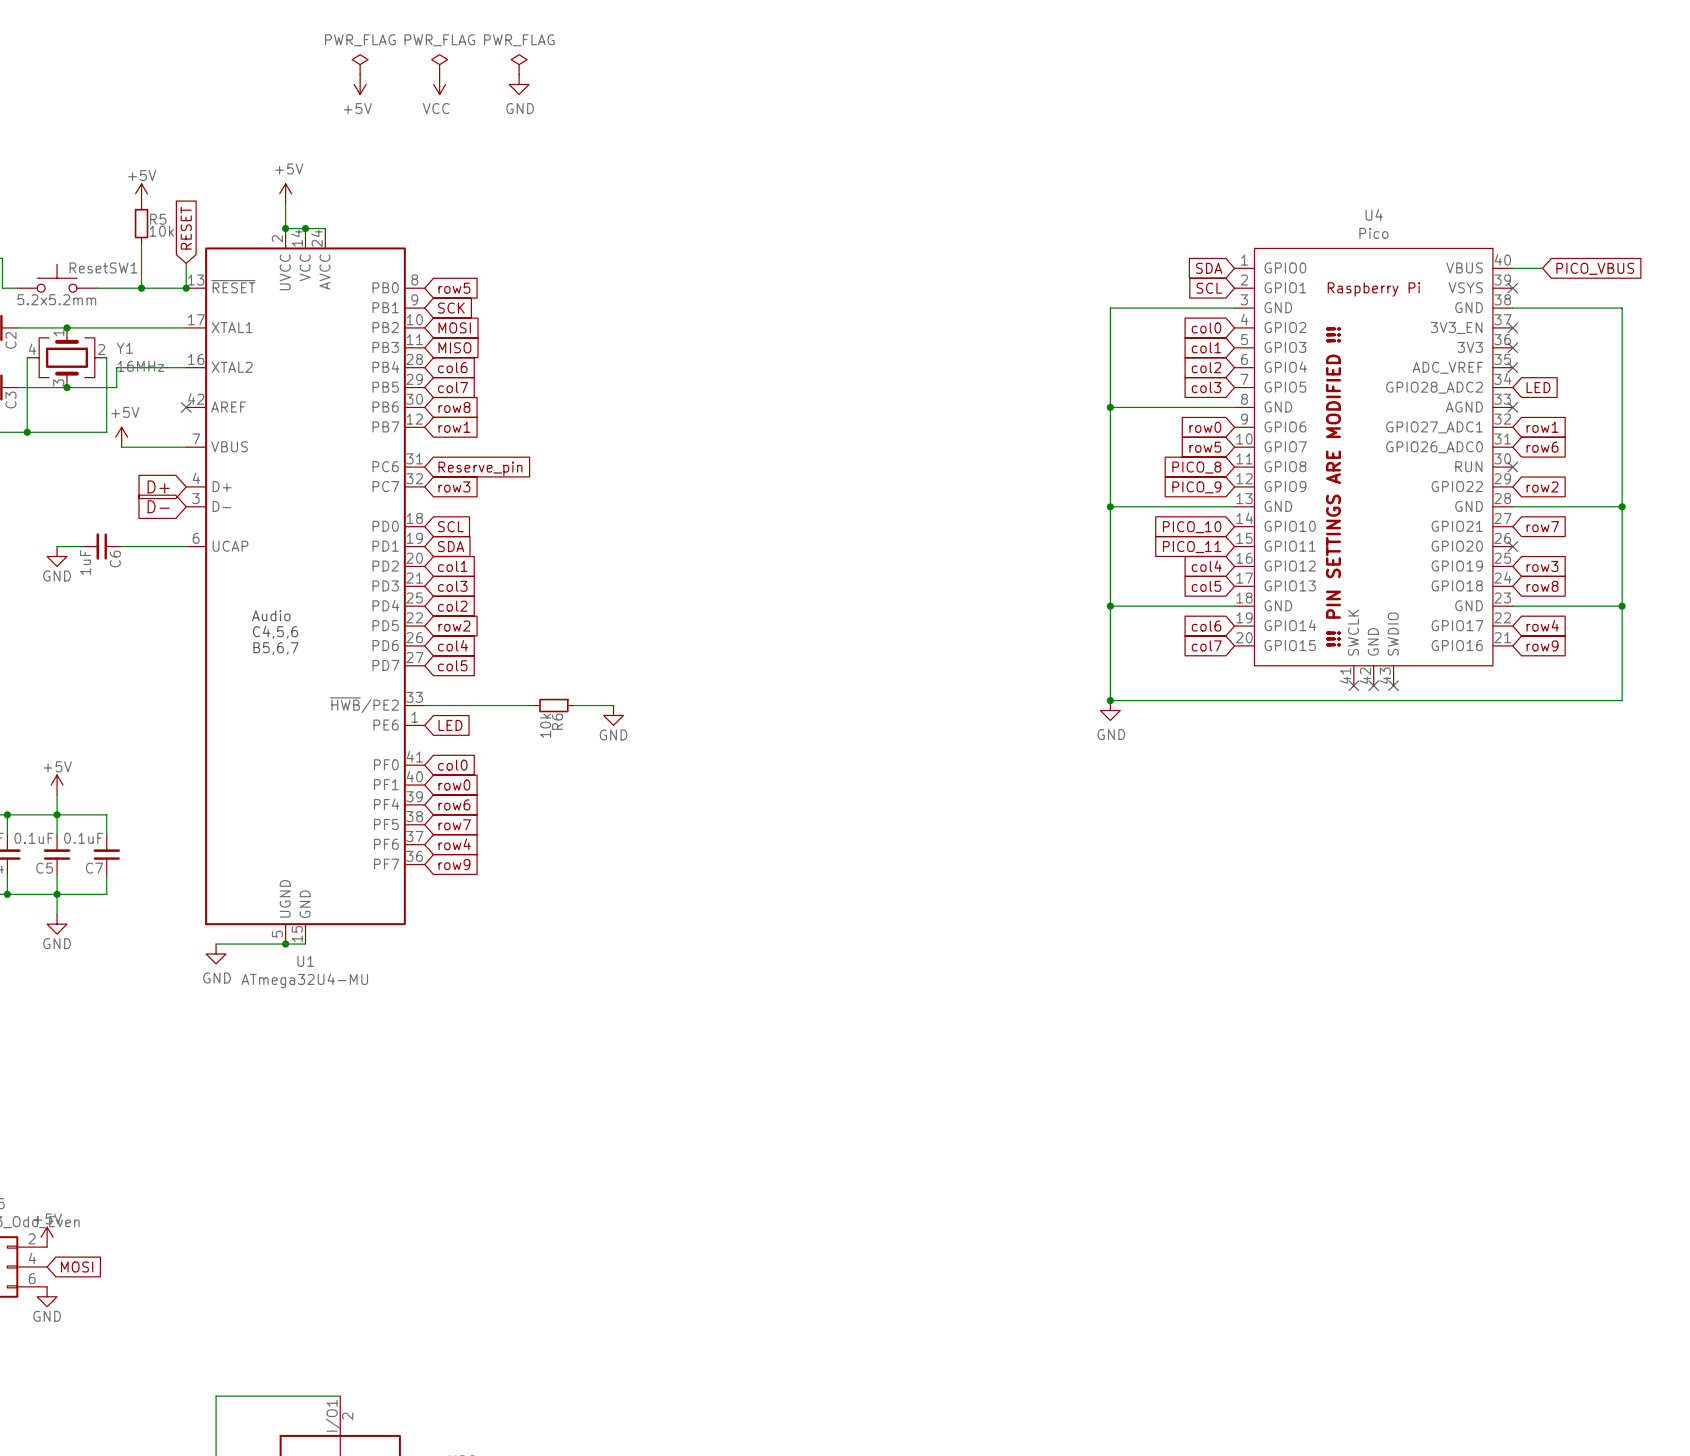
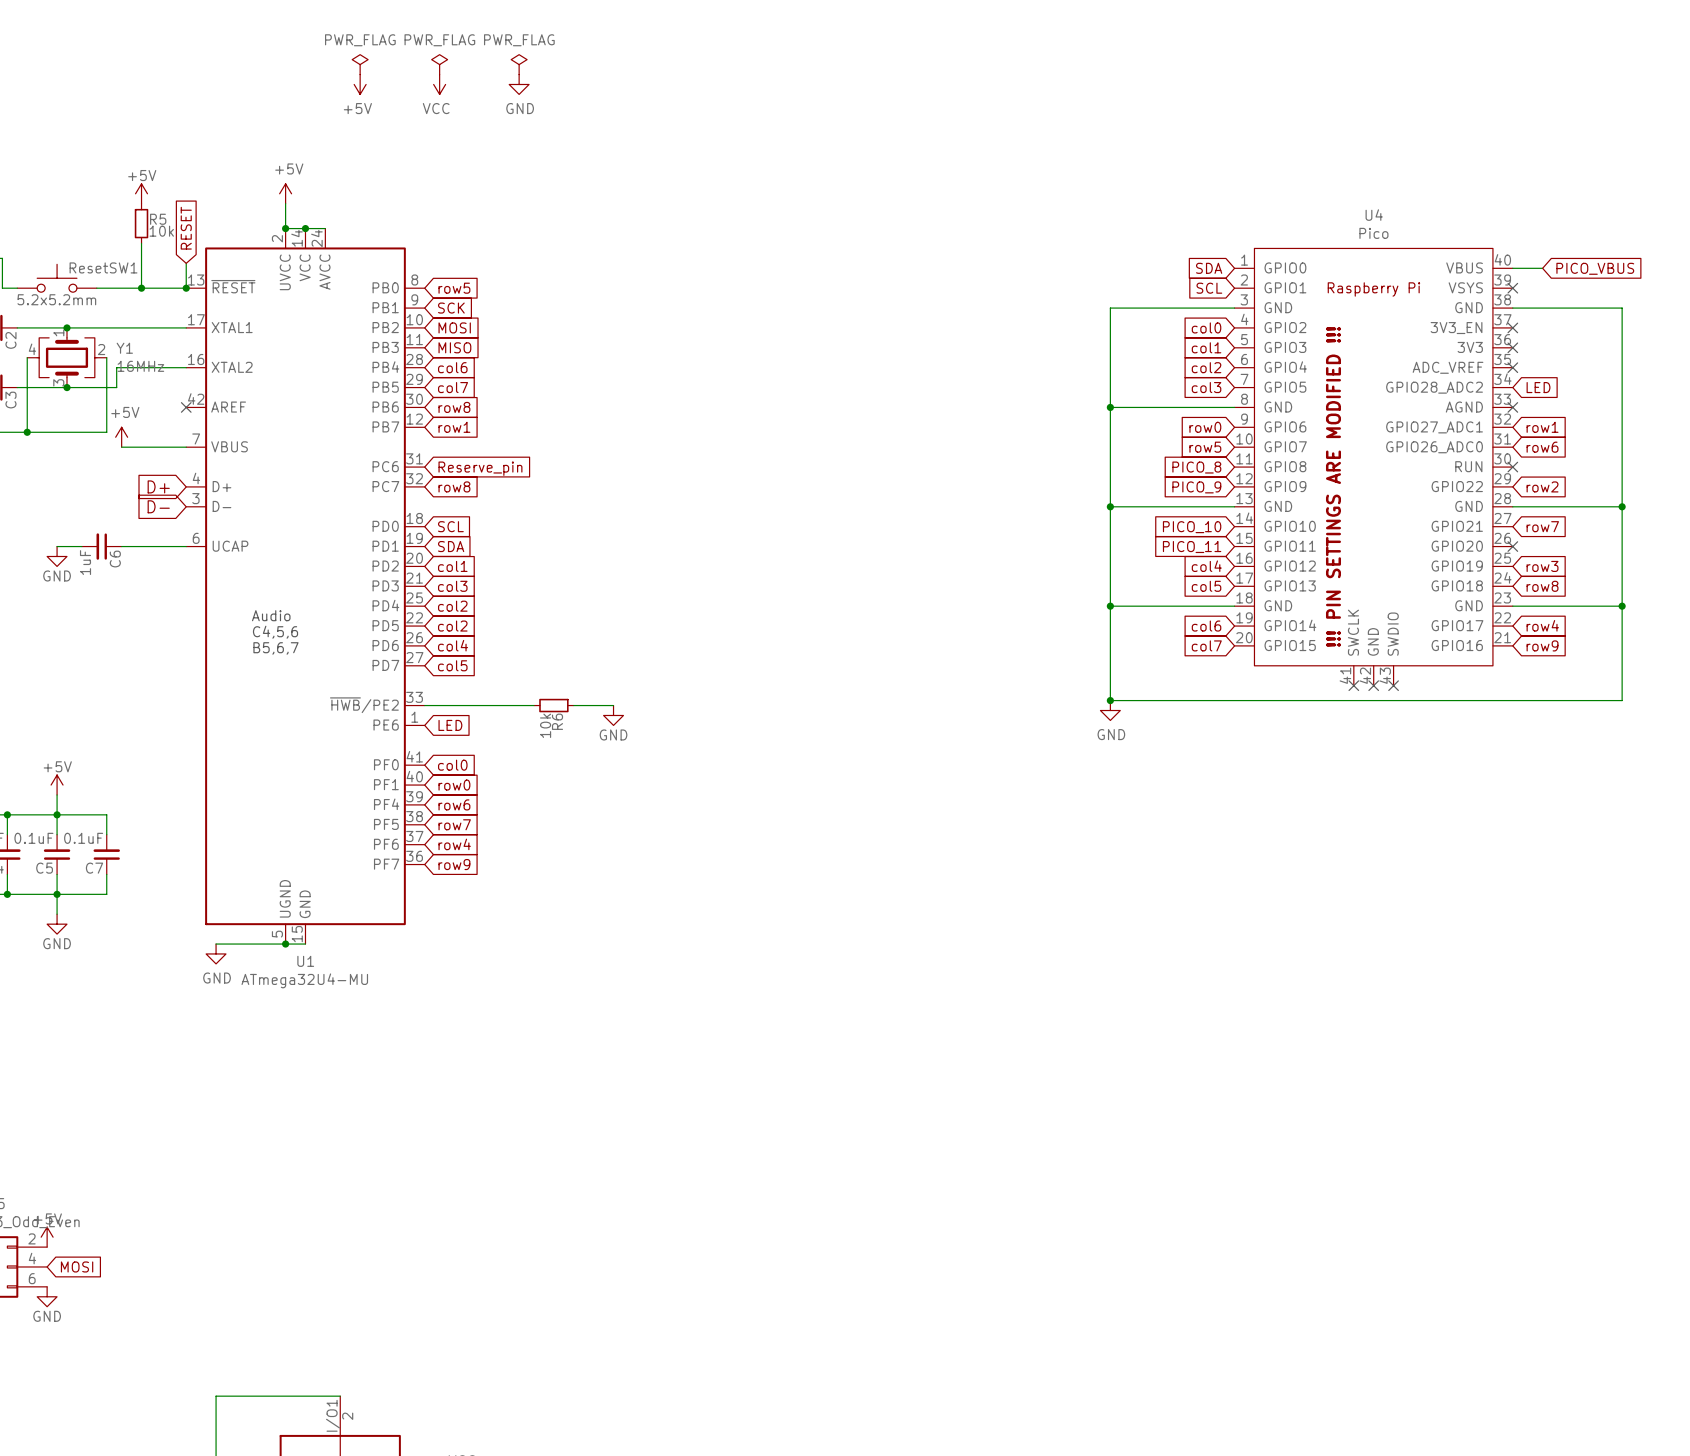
global label: row3 (454, 486) -> row8 (454, 486)
global label: row2 (454, 626) -> col2 (452, 626)

